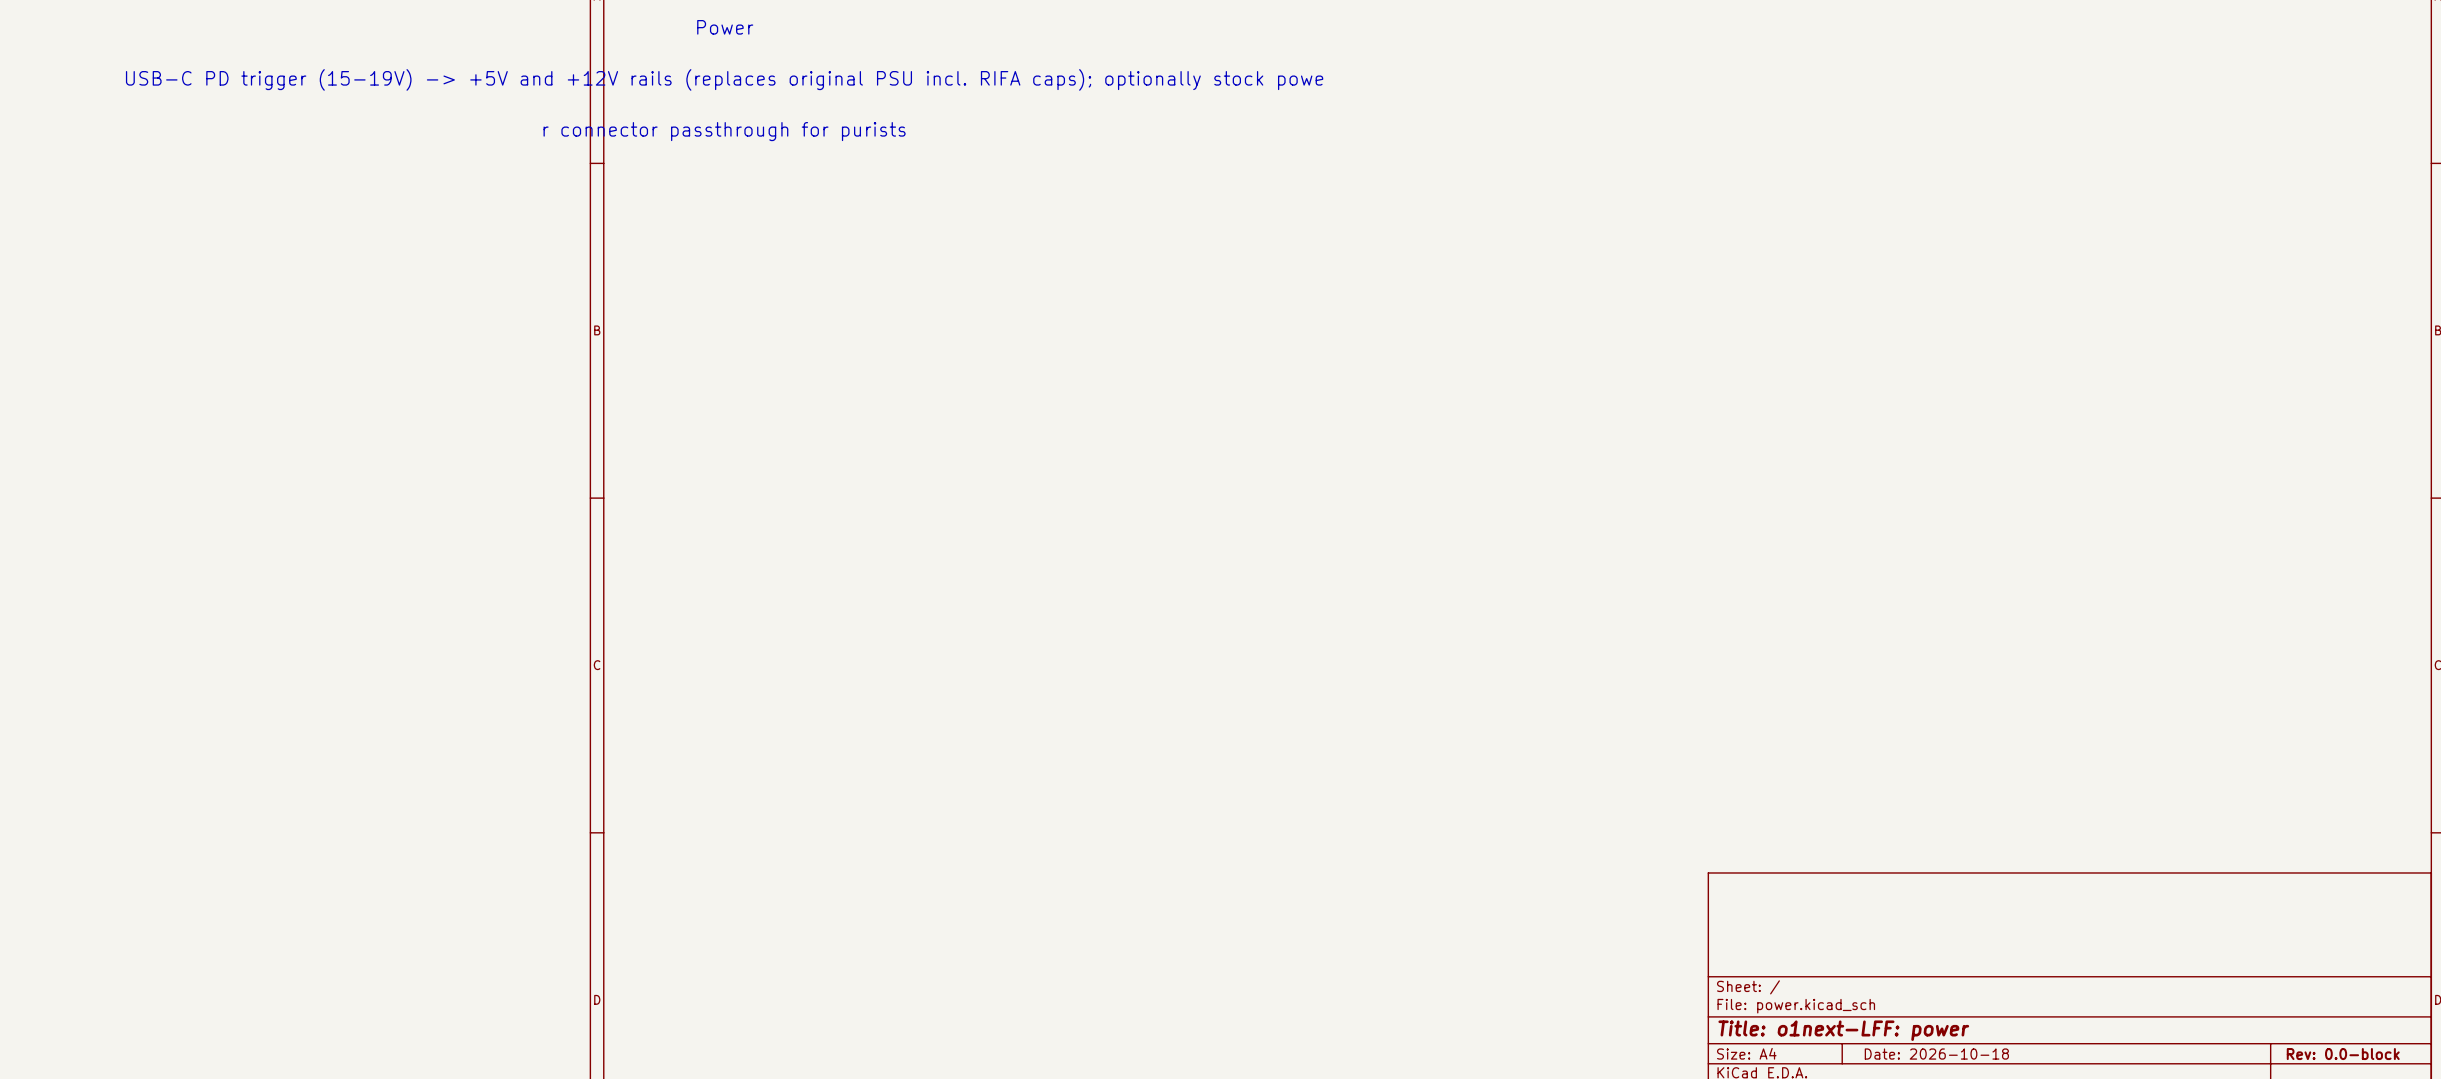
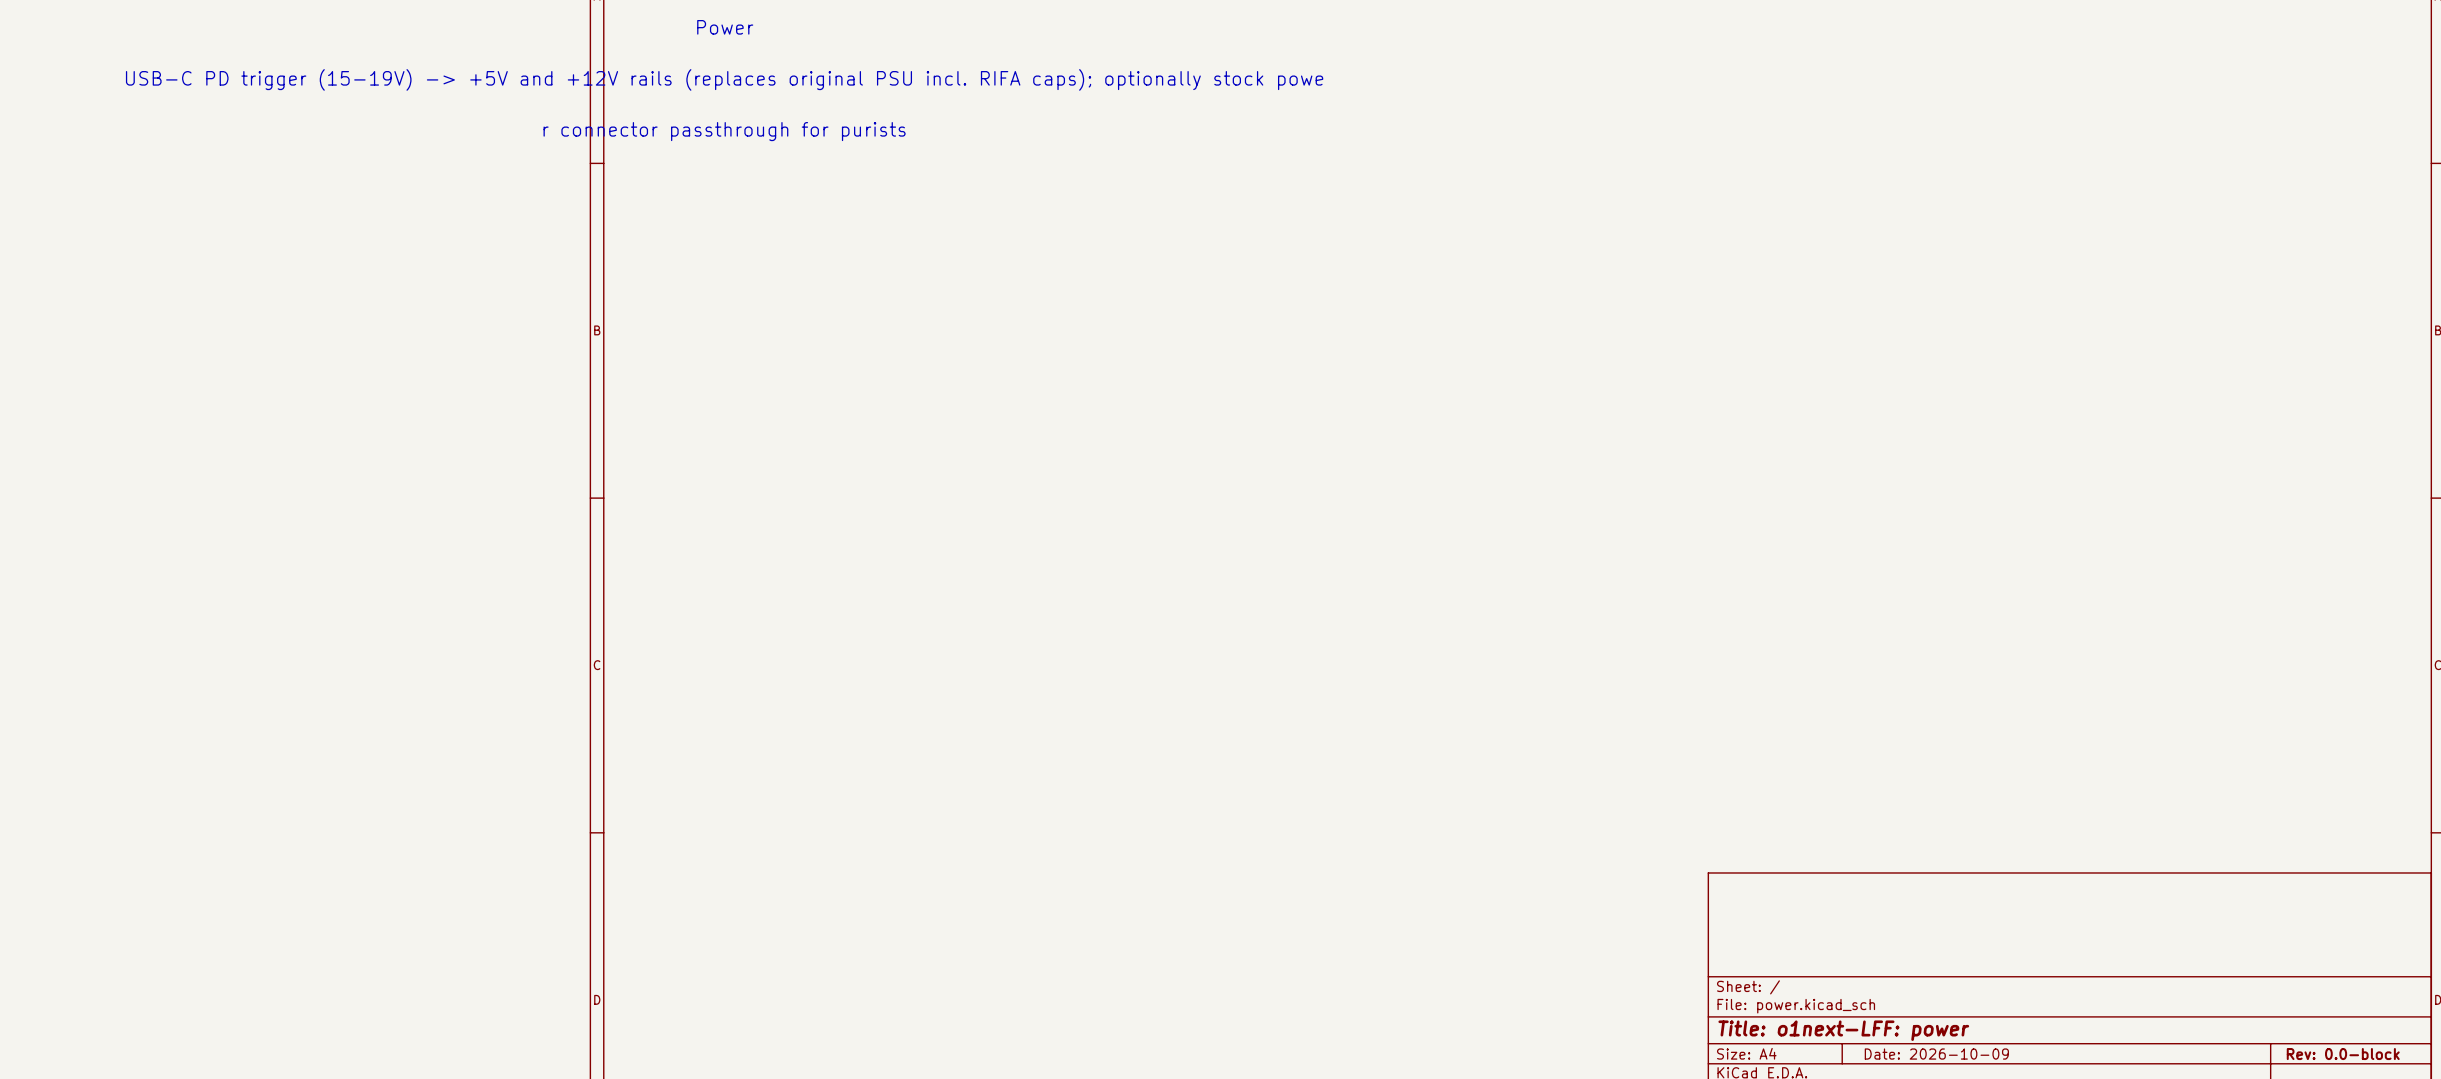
title block: Date: 2026-10-18 (1936, 1054) -> Date: 2026-10-09 (1936, 1054)

